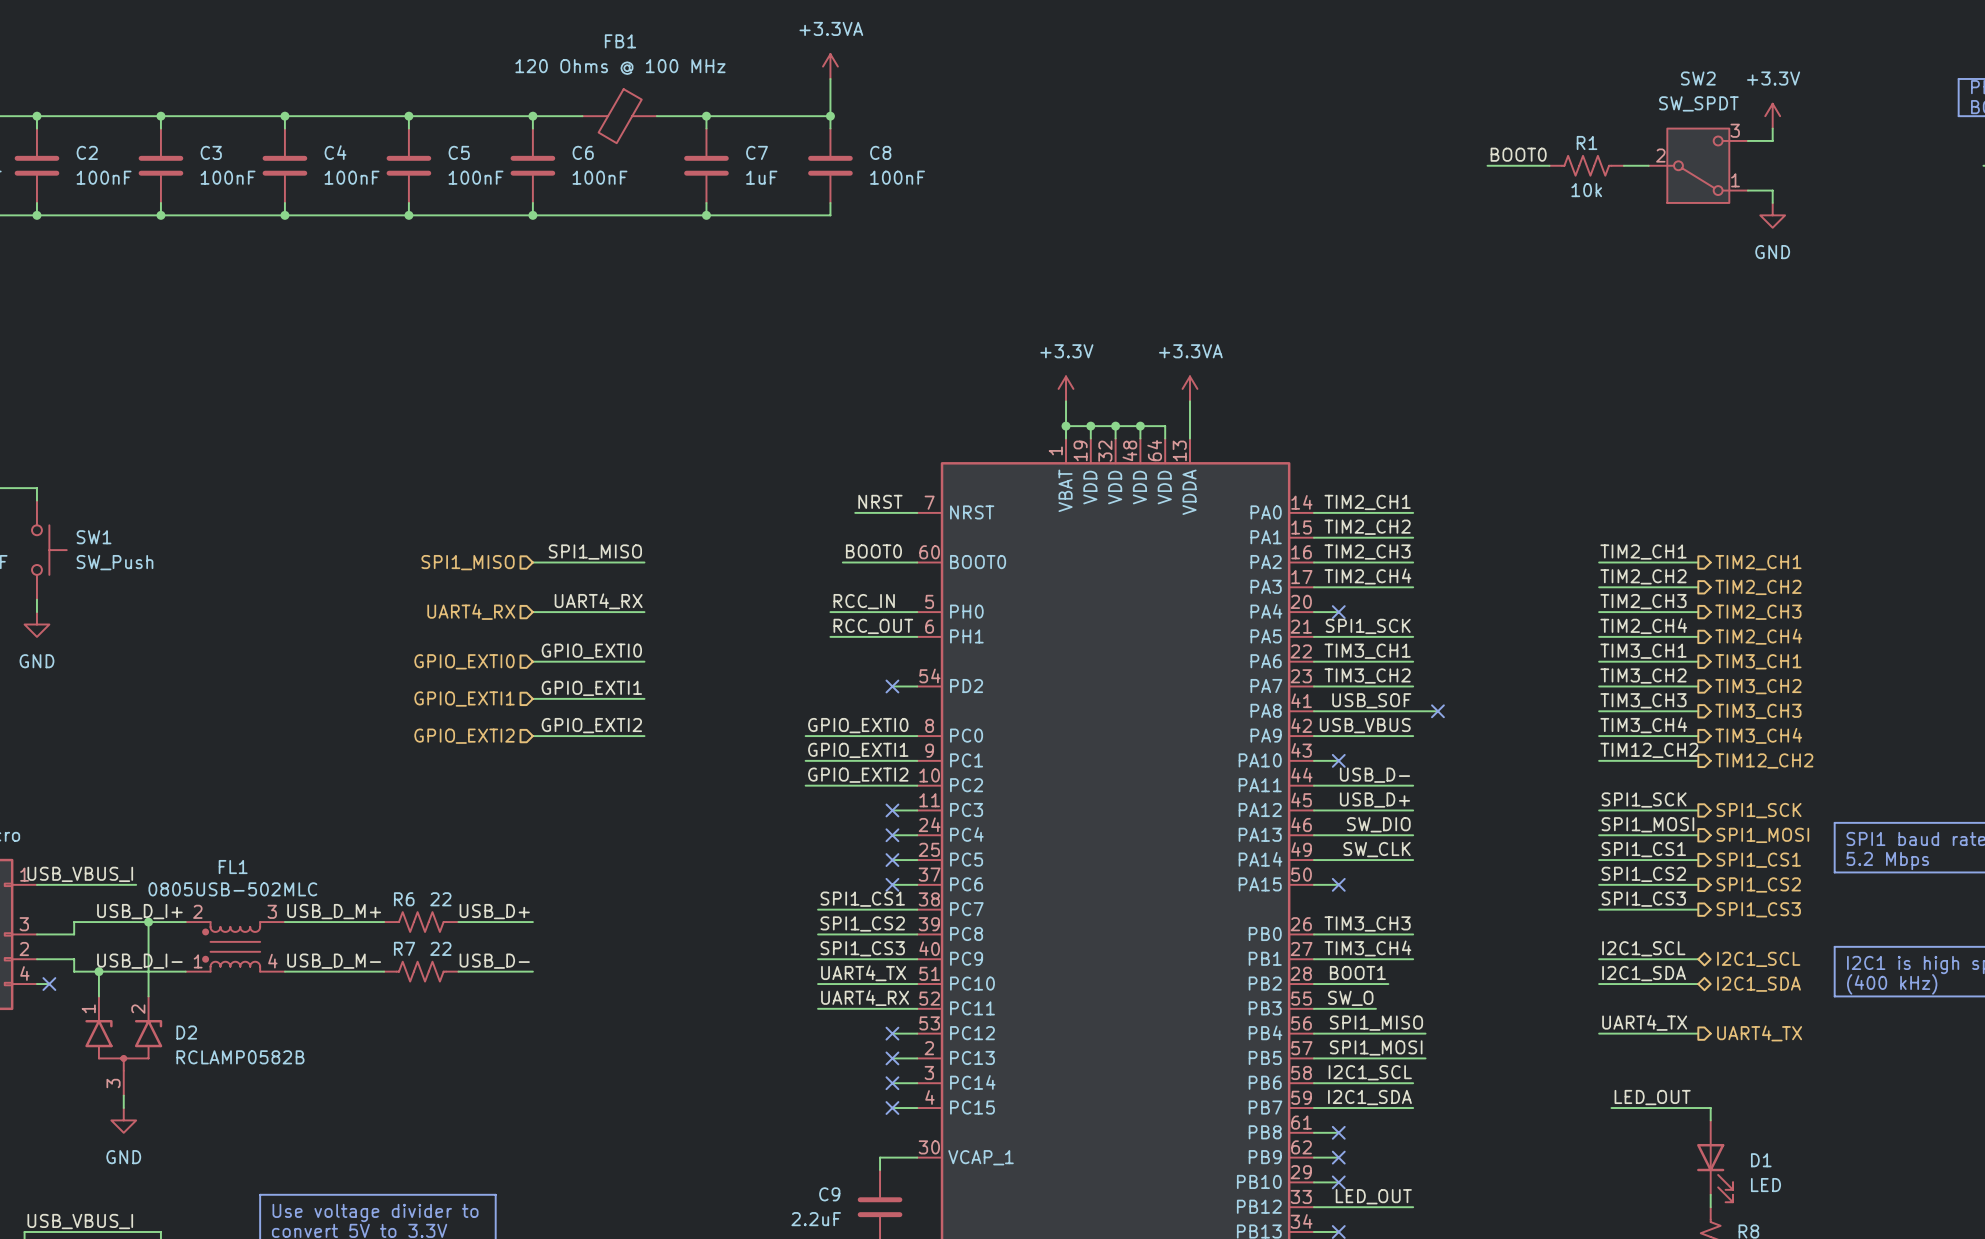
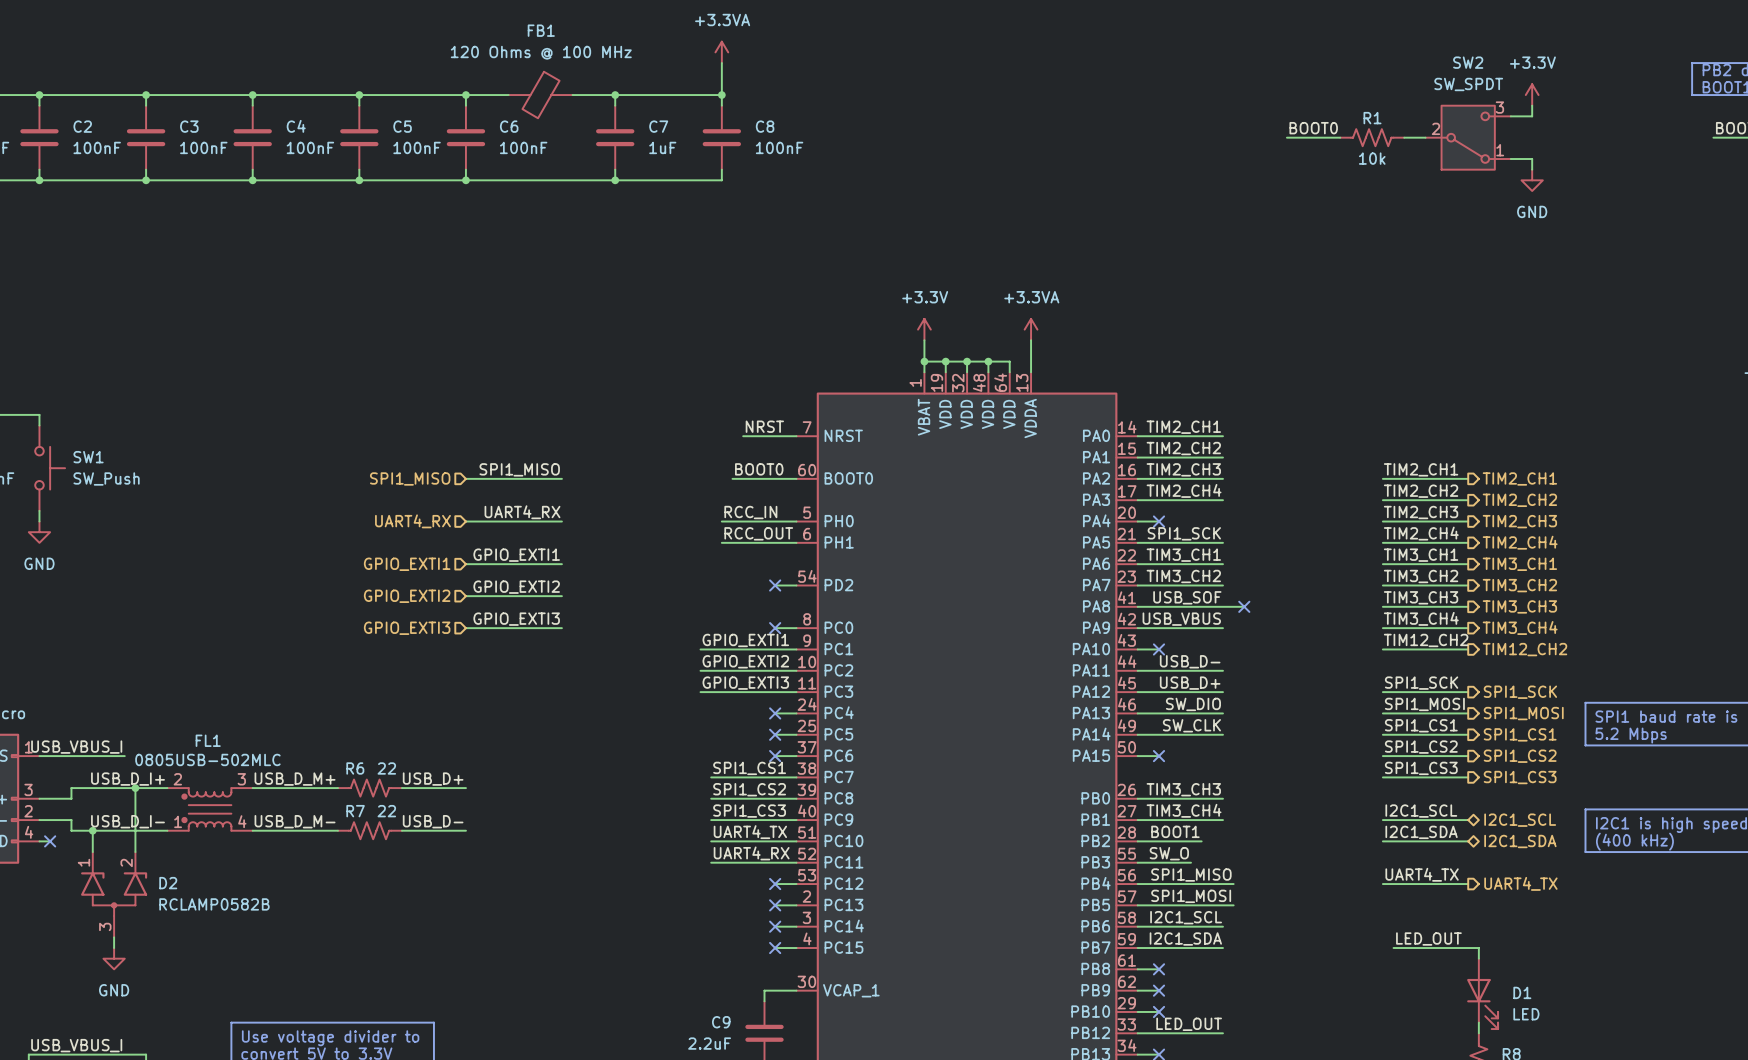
label: GPIO_EXTI0 (591, 651) -> GPIO_EXTI1 (516, 555)
hierarchical label: GPIO_EXTI0 (464, 661) -> GPIO_EXTI1 (407, 564)
label: GPIO_EXTI1 (591, 688) -> GPIO_EXTI2 (516, 587)
hierarchical label: GPIO_EXTI1 (464, 699) -> GPIO_EXTI2 (407, 596)
label: GPIO_EXTI2 (591, 725) -> GPIO_EXTI3 (516, 619)
label: GPIO_EXTI0 (858, 725) -> none
hierarchical label: GPIO_EXTI2 (464, 736) -> GPIO_EXTI3 (407, 628)
wire: (805, 736) (892, 736) -> (700, 692) (775, 692)
no-connect mark: none -> (775, 628)
label: none -> GPIO_EXTI3 (745, 683)
no-connect mark: (892, 810) -> none

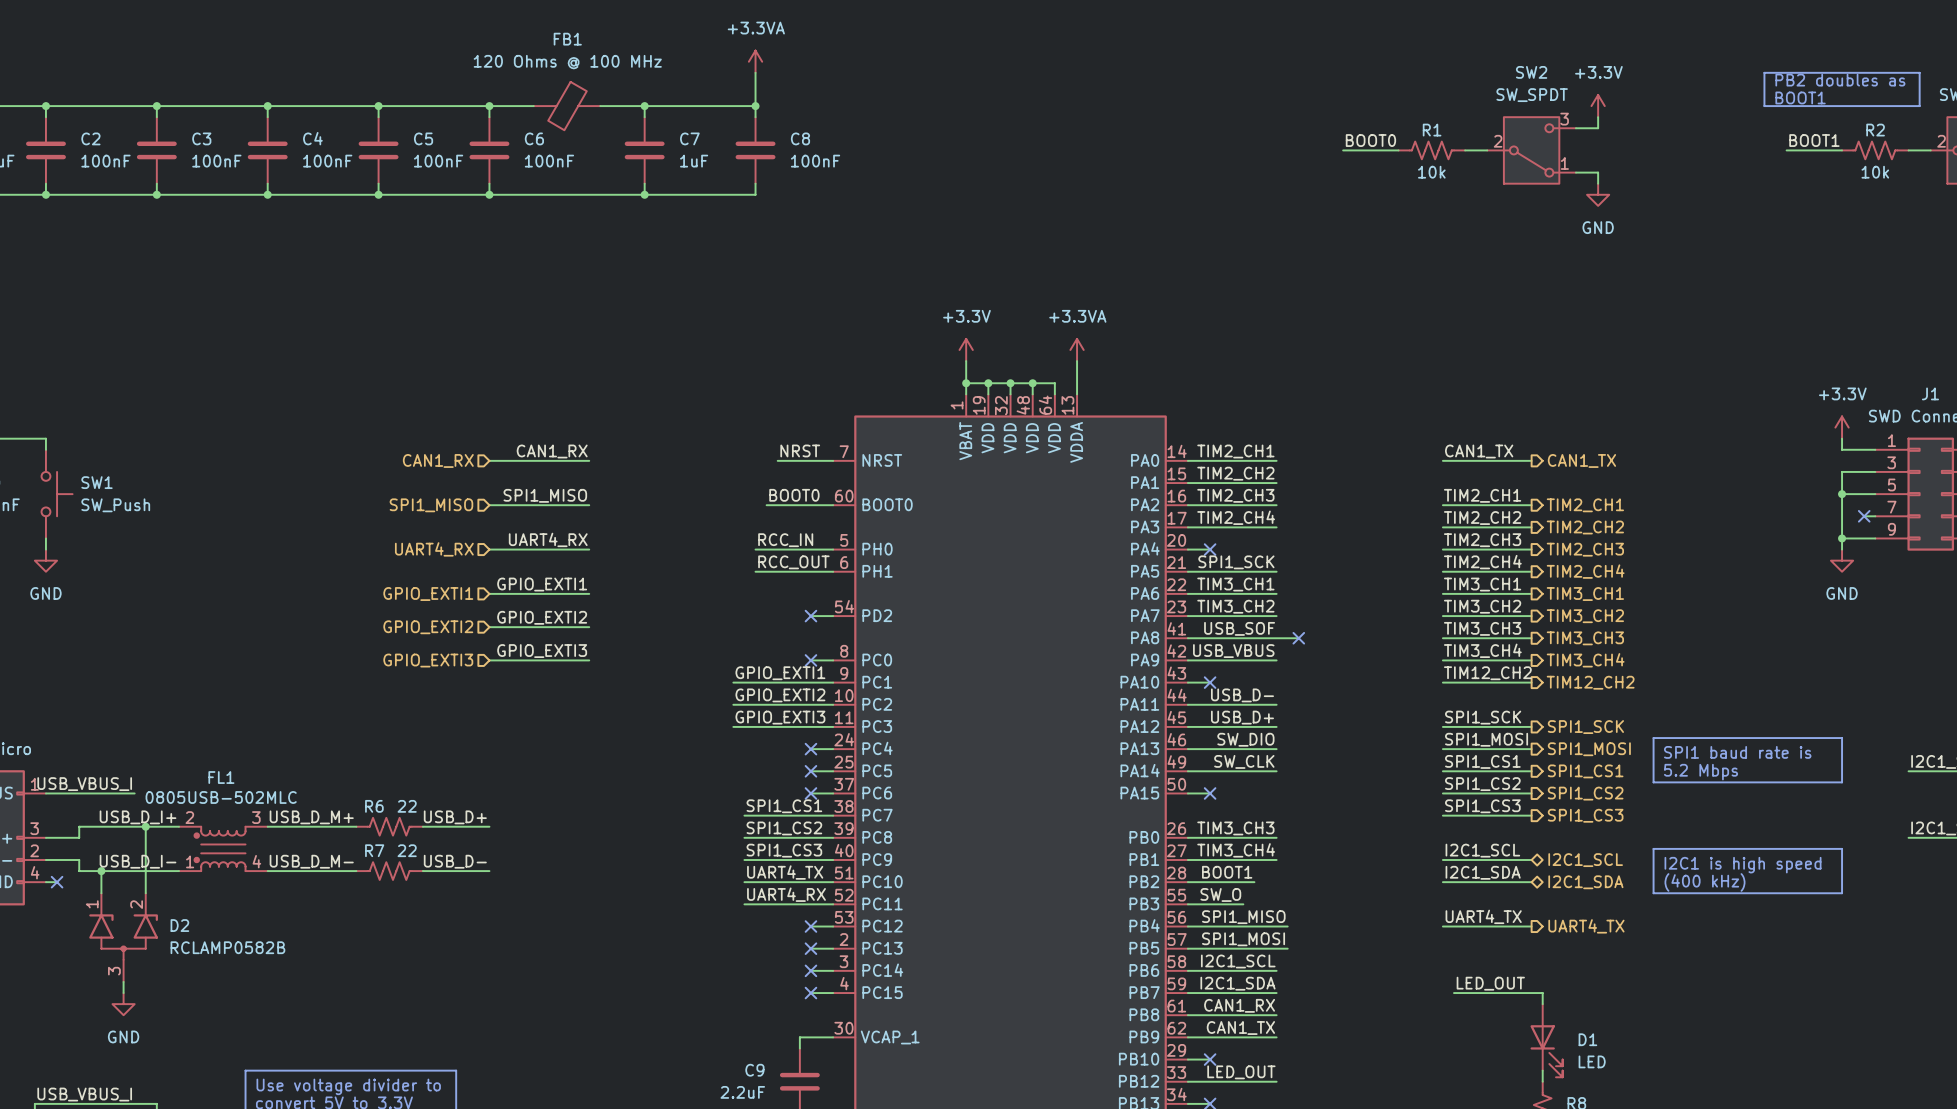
label: none -> CAN1_RX (552, 451)
label: none -> CAN1_TX (1479, 451)
hierarchical label: none -> CAN1_RX (438, 460)
wire: none -> (489, 460) (589, 460)
wire: none -> (1442, 460) (1531, 460)
hierarchical label: none -> CAN1_TX (1581, 460)
label: none -> CAN1_RX (1239, 1005)
wire: none -> (1210, 1015) (1276, 1015)
no-connect mark: (1159, 969) -> none
label: none -> CAN1_TX (1240, 1028)
wire: none -> (1210, 1037) (1276, 1037)
no-connect mark: (1159, 990) -> none

